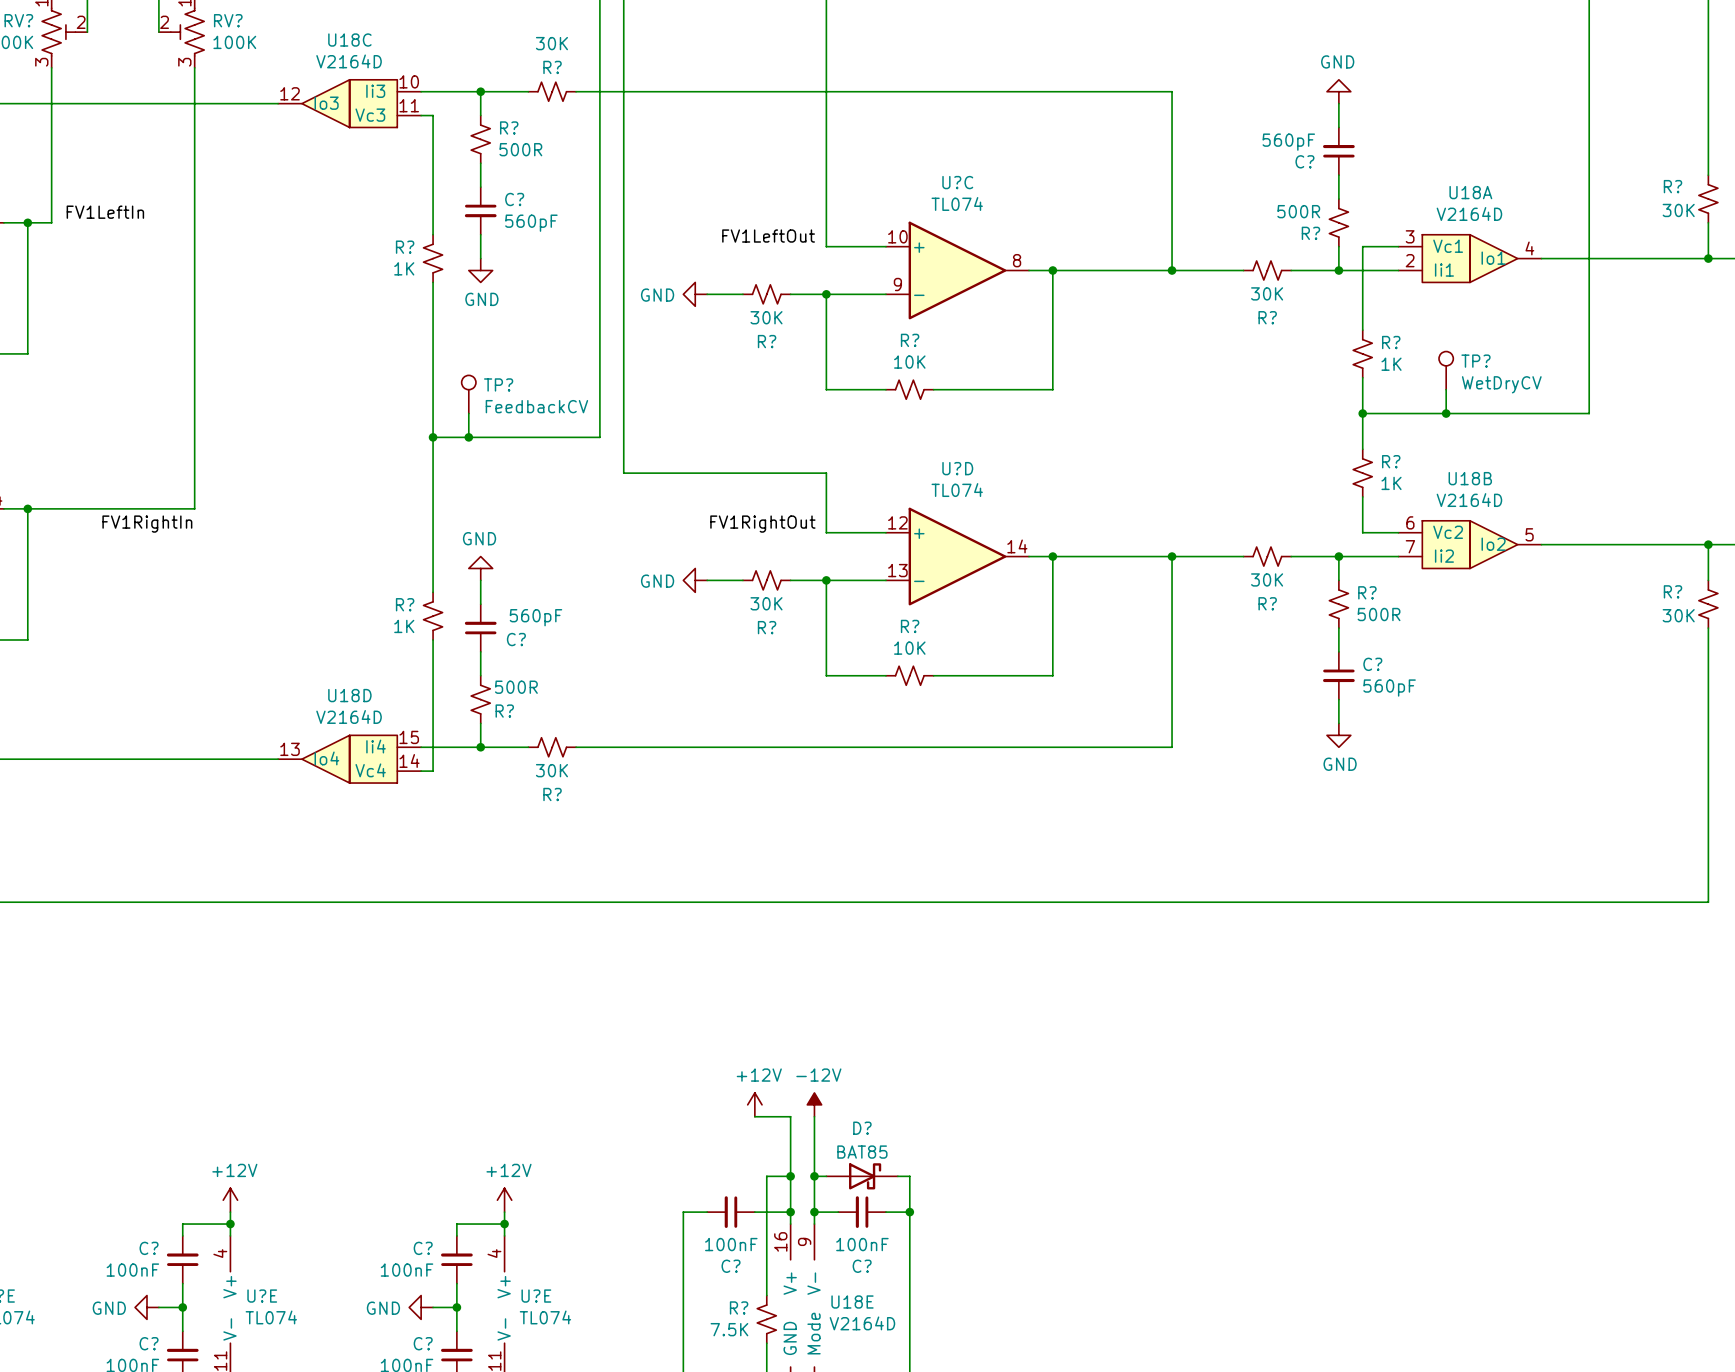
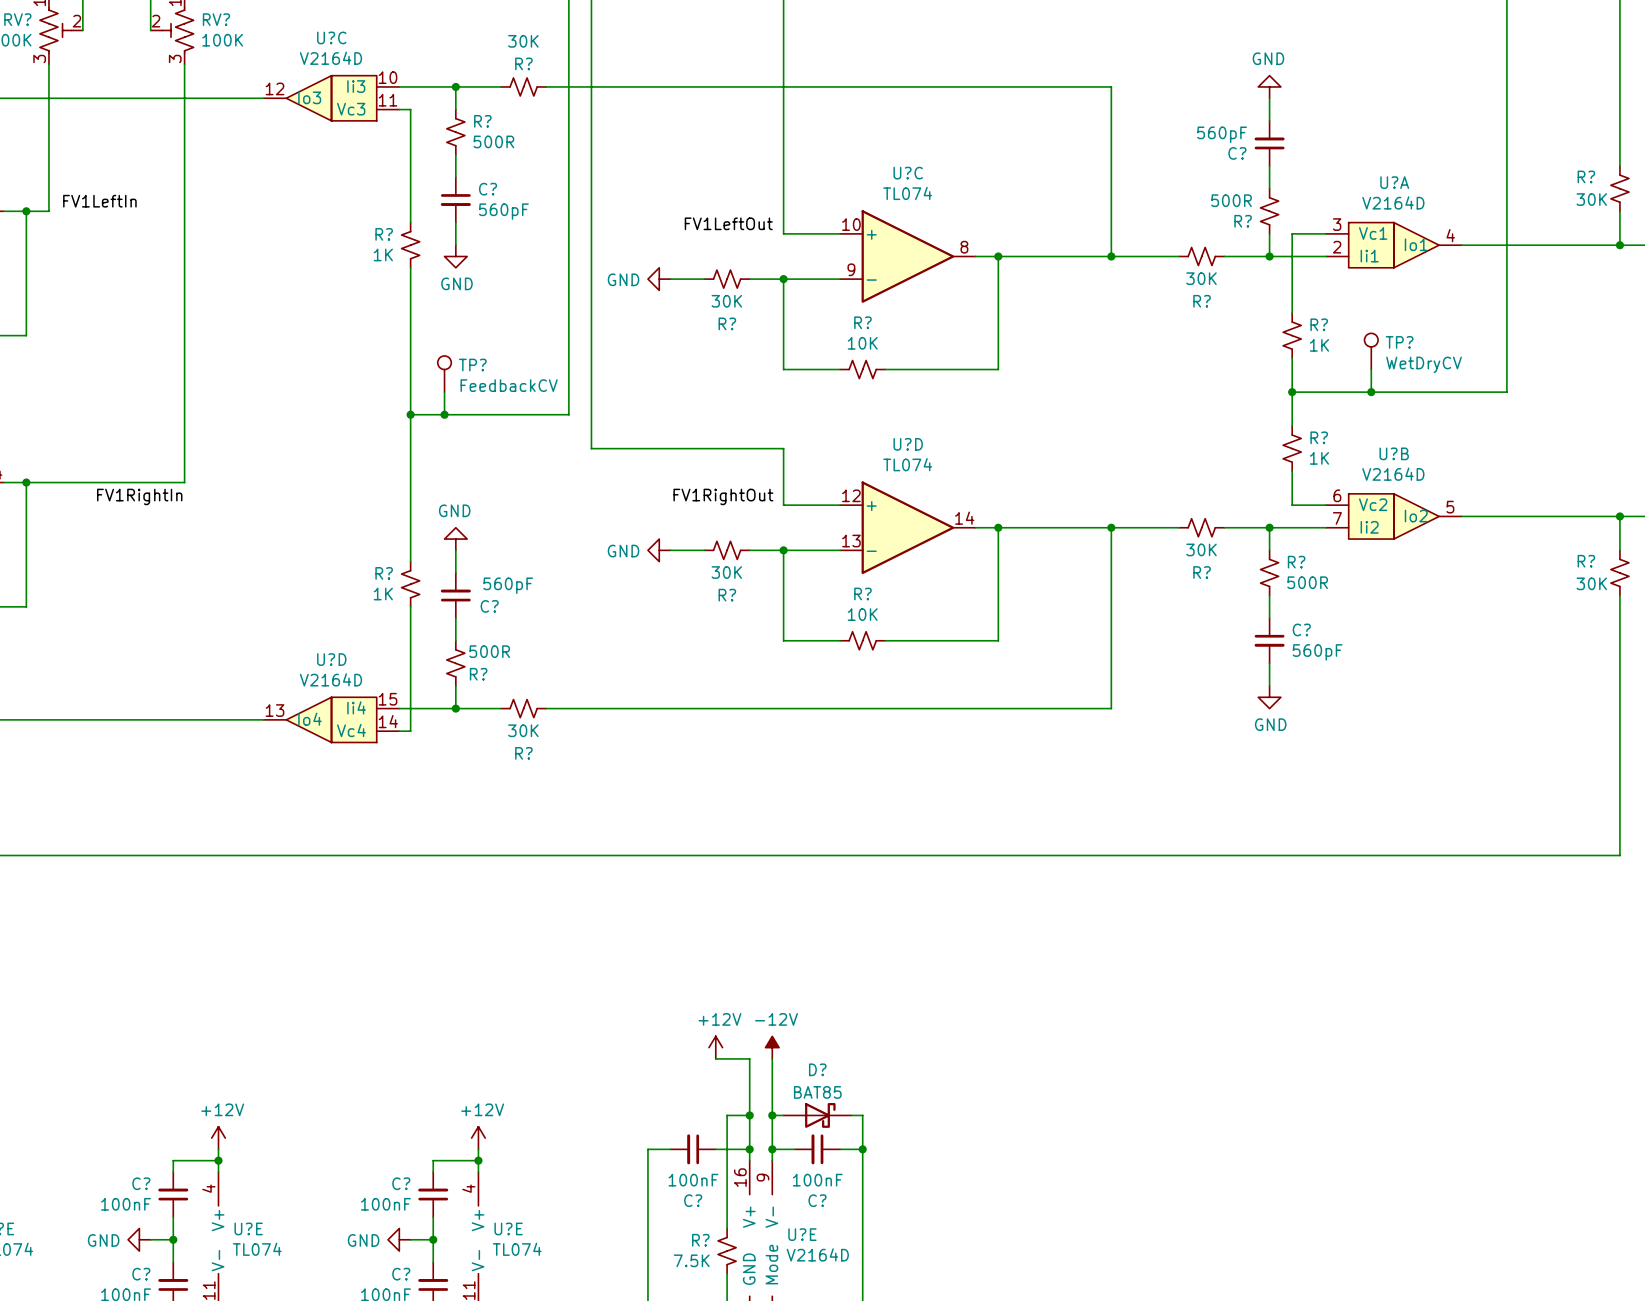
U18C name: U18C (349, 40) -> U?C (331, 37)
U18A name: U18A (1470, 192) -> U?A (1394, 182)
U18B name: U18B (1470, 478) -> U?B (1394, 453)
U18D name: U18D (349, 695) -> U?D (331, 659)
U18E name: U18E (852, 1302) -> U?E (802, 1234)

